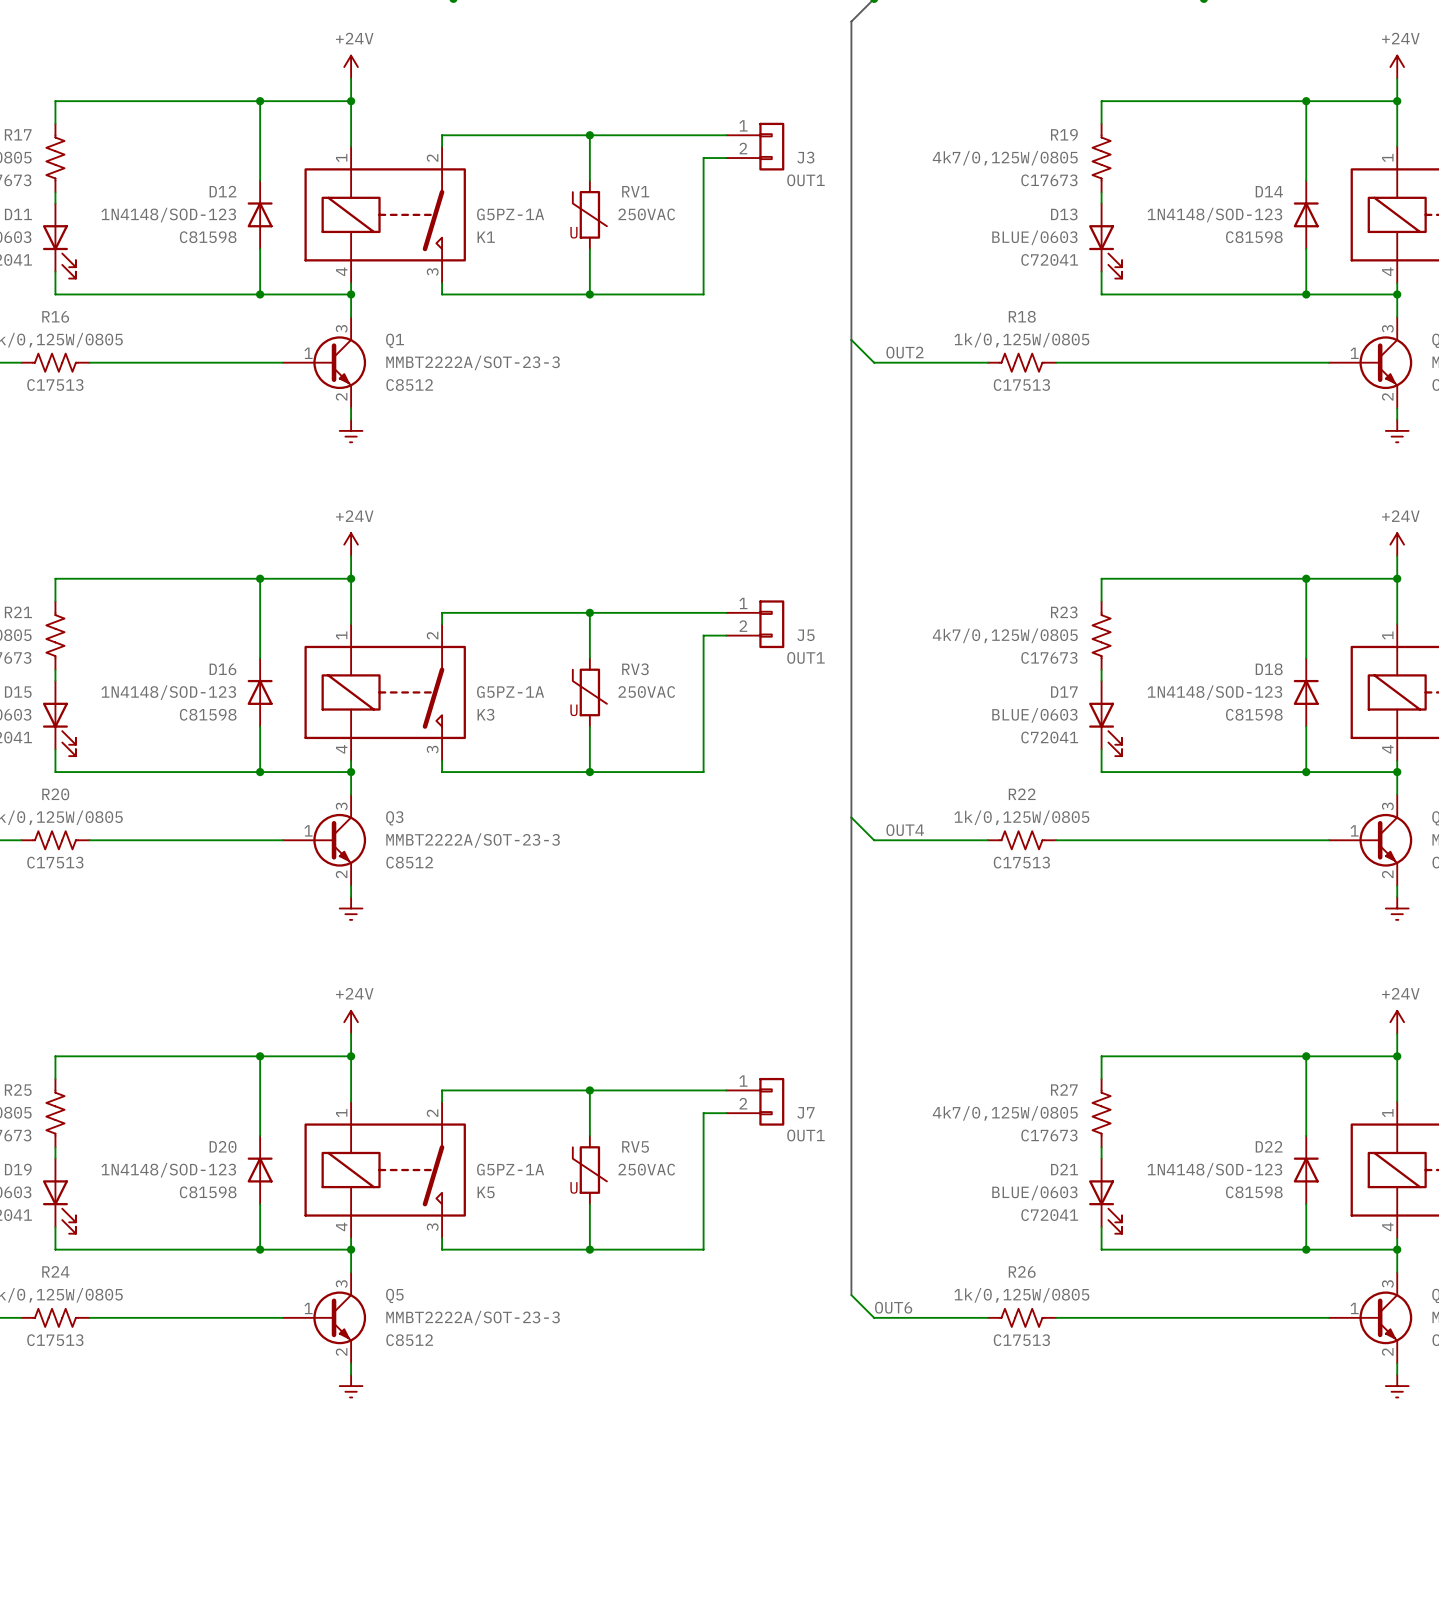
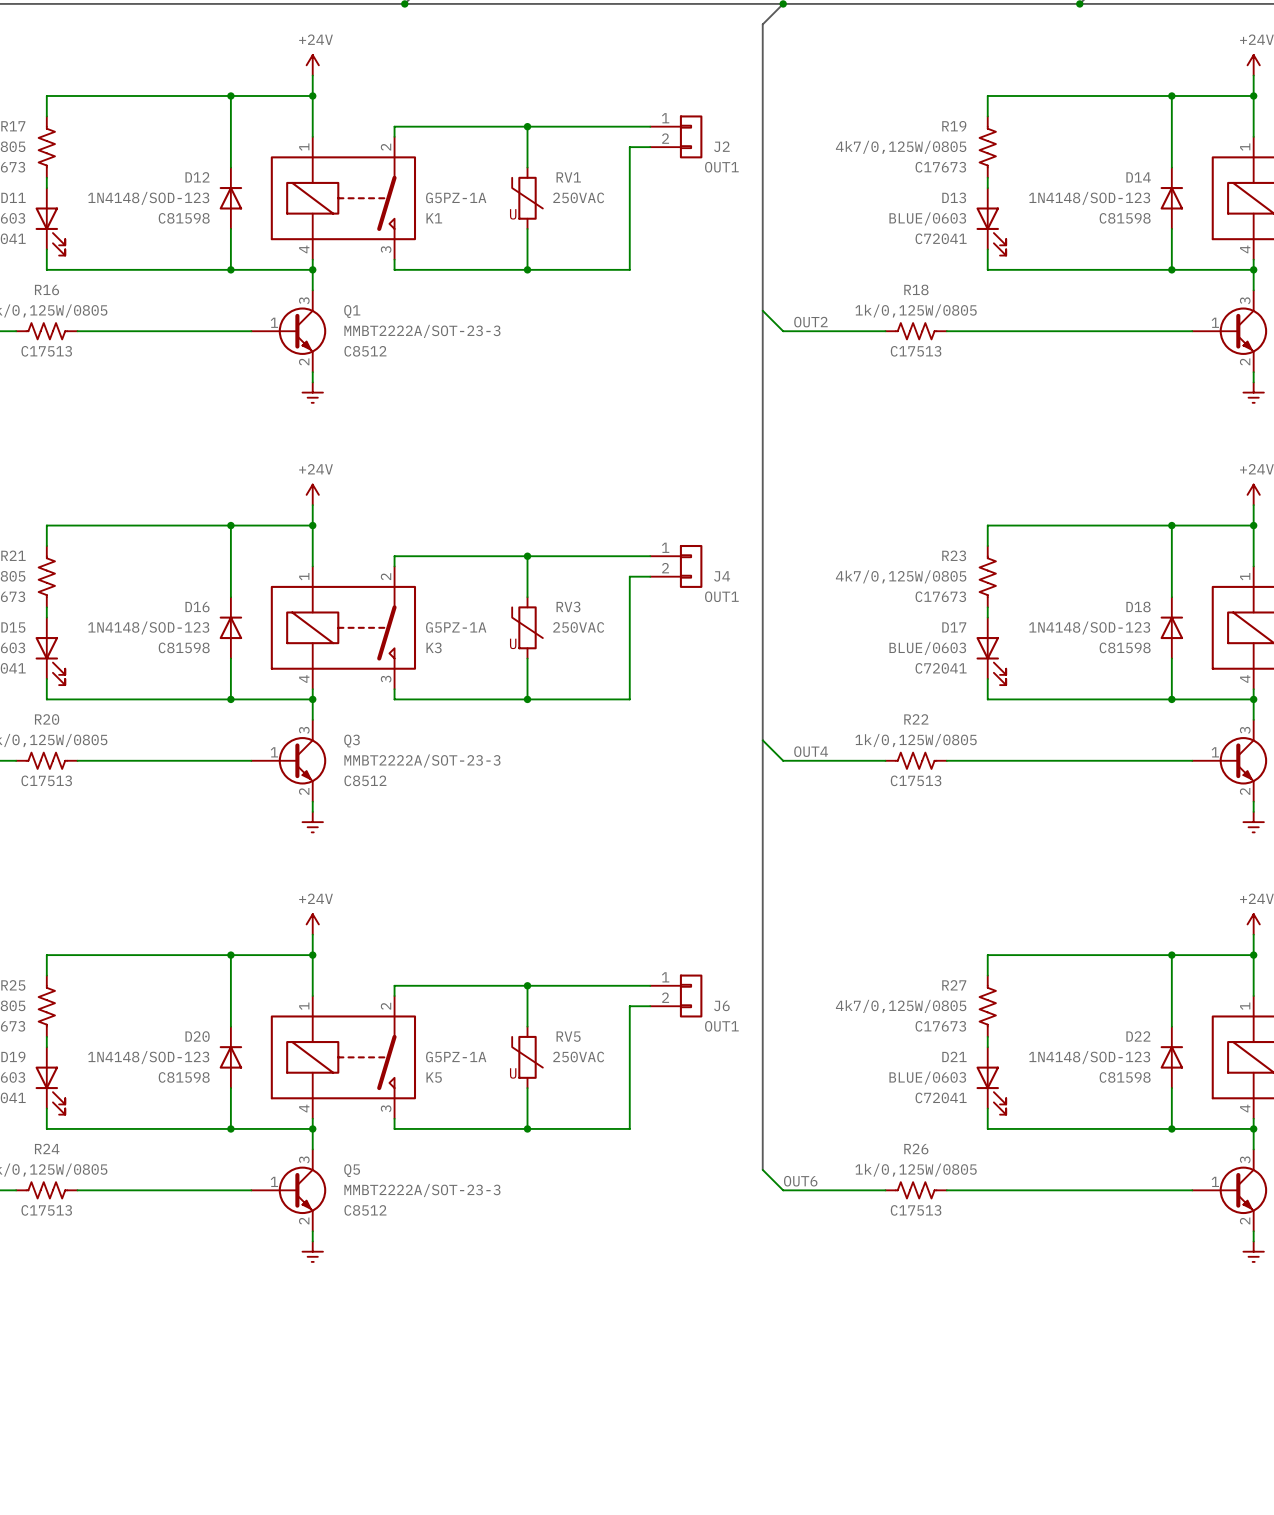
J3 name: J3 (805, 157) -> J2 (721, 146)
J5 name: J5 (805, 635) -> J4 (722, 576)
J7 name: J7 (805, 1112) -> J6 (721, 1005)

